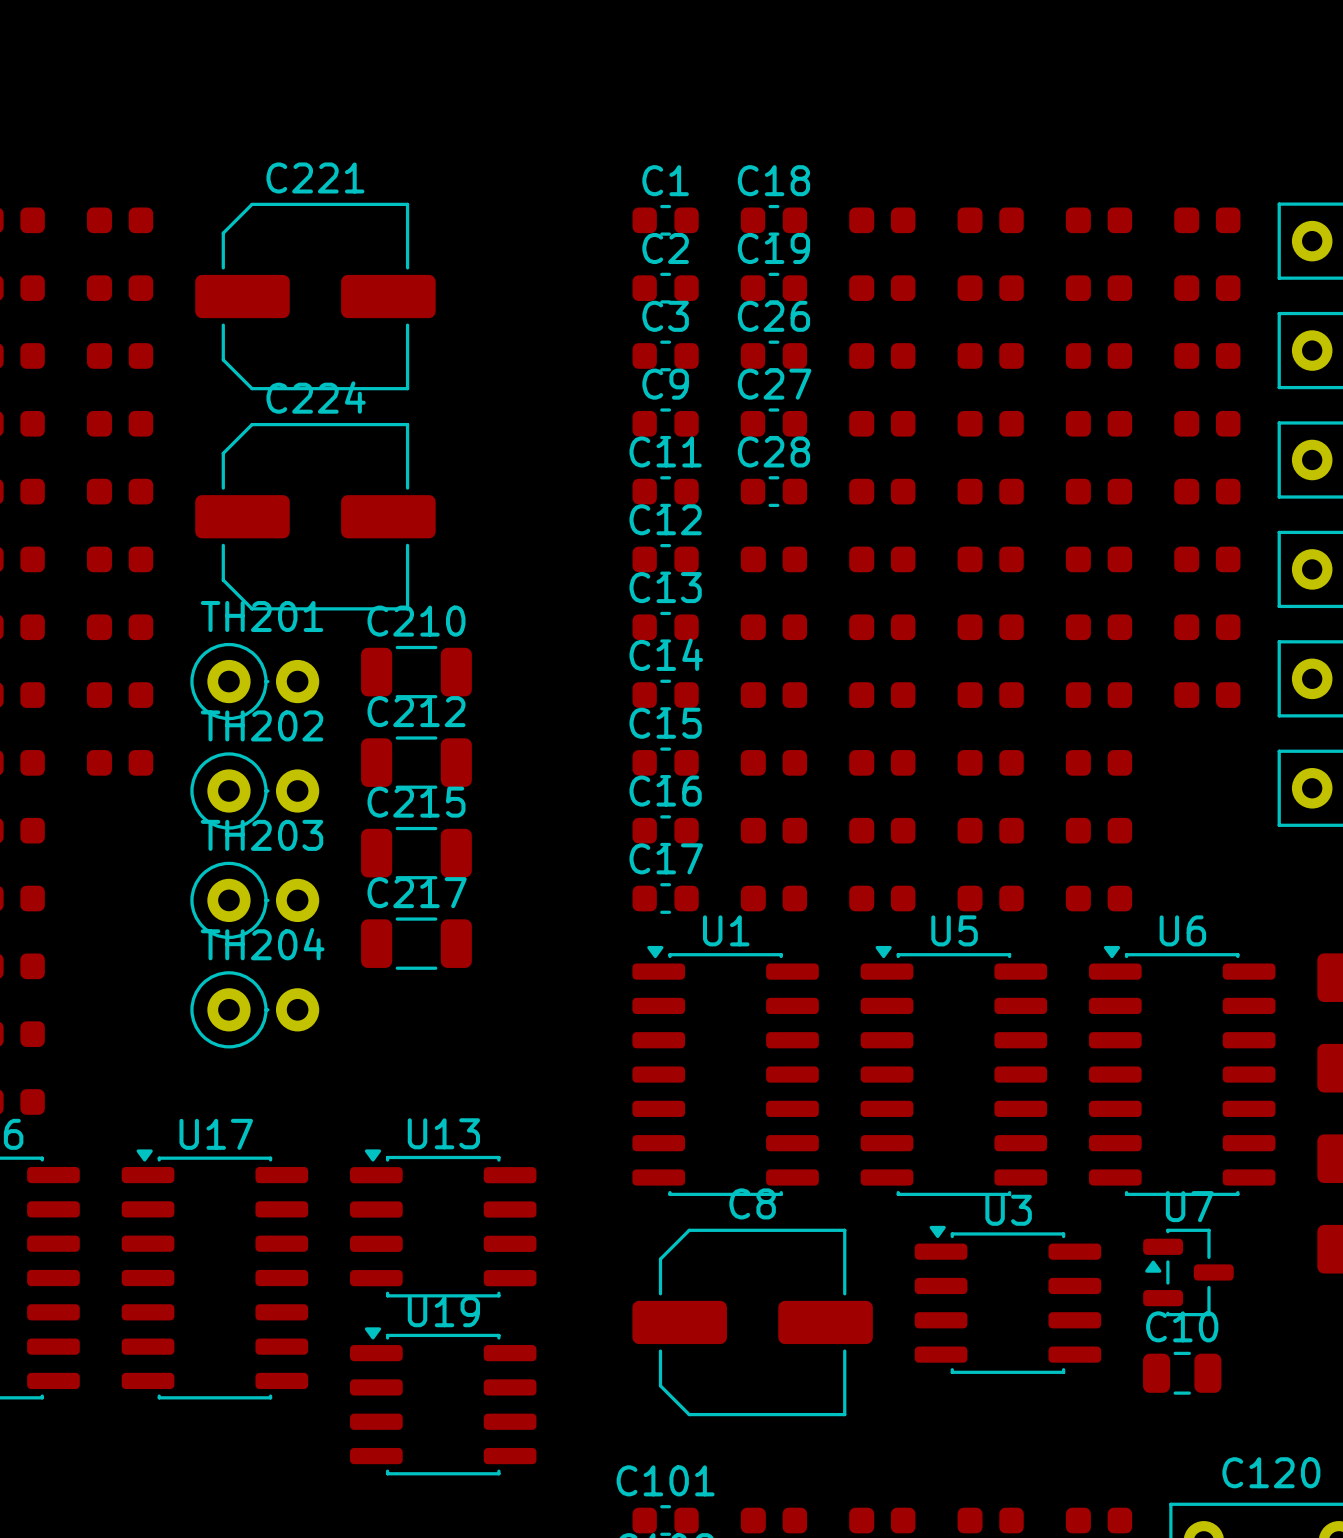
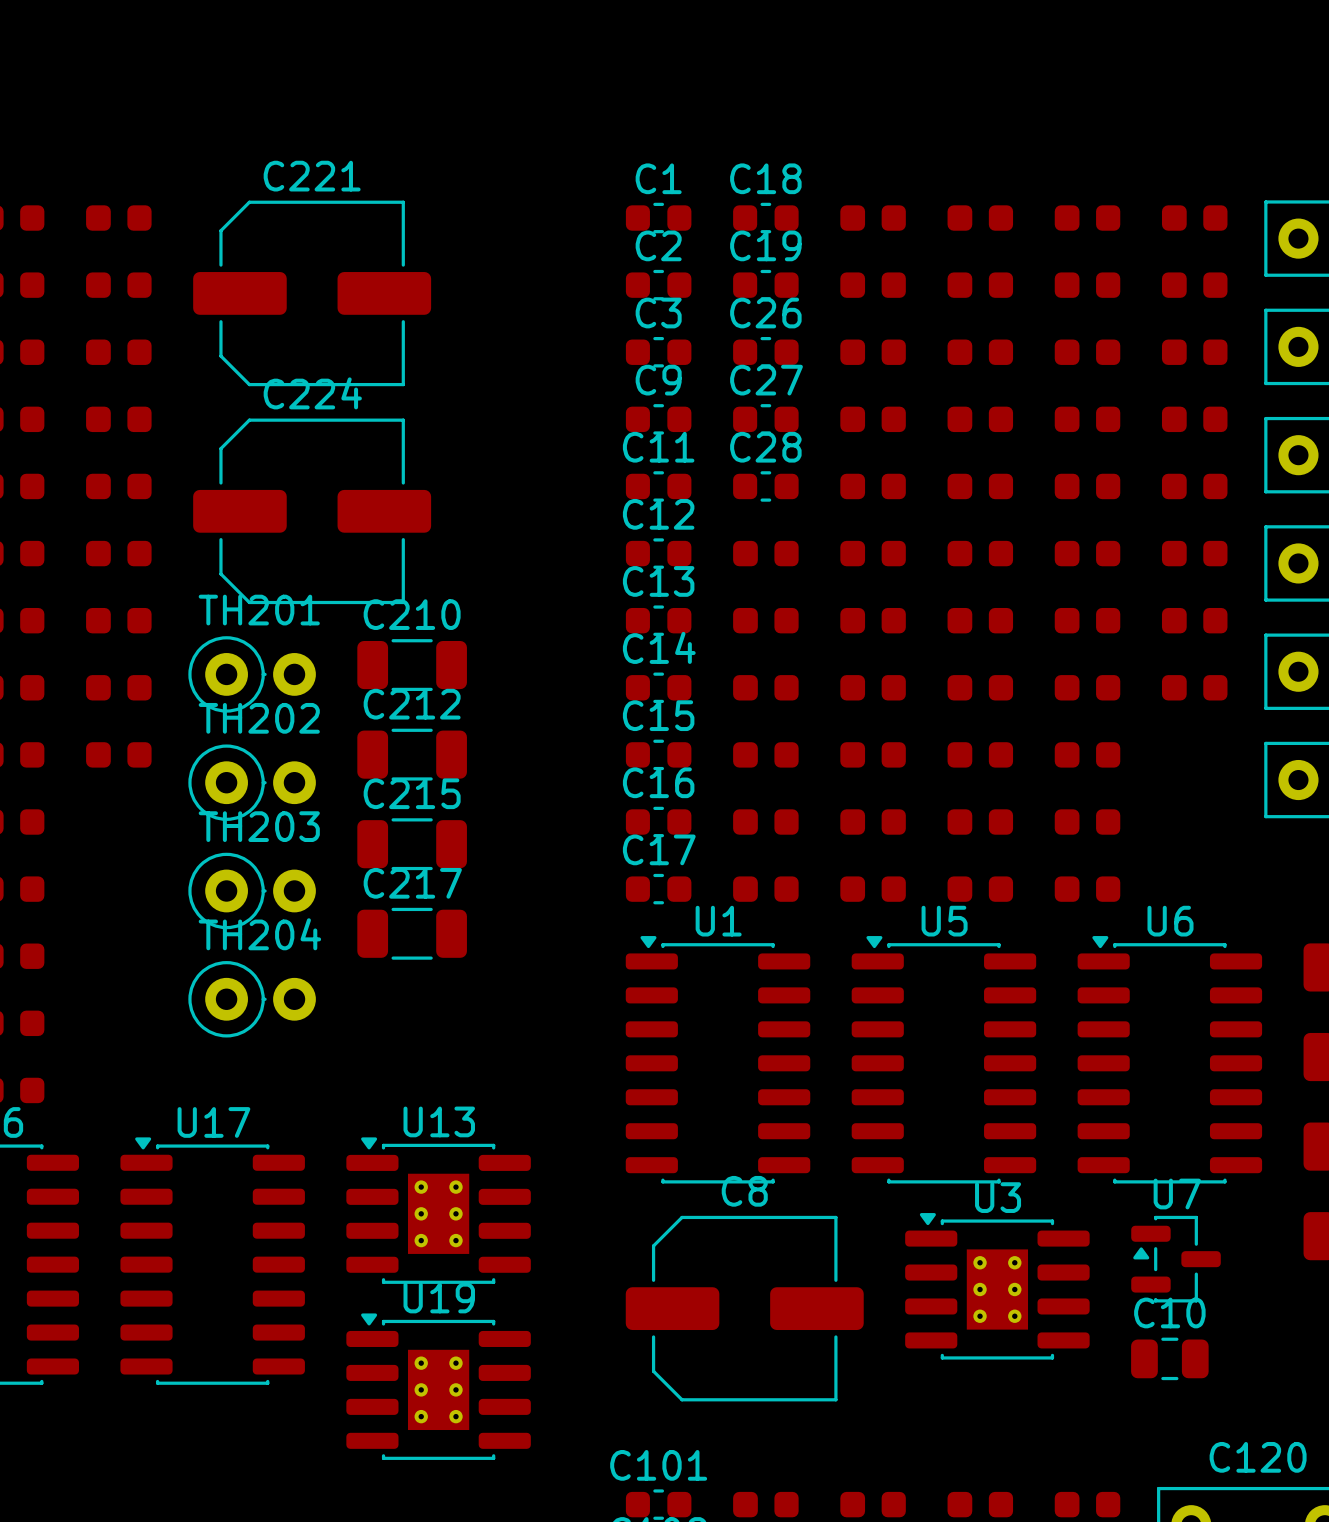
U13 footprint: [350, 1149, 537, 1298] -> [346, 1137, 531, 1284]
U3 footprint: [914, 1225, 1102, 1374] -> [905, 1213, 1090, 1360]
U19 footprint: [350, 1327, 537, 1476] -> [346, 1313, 531, 1460]

